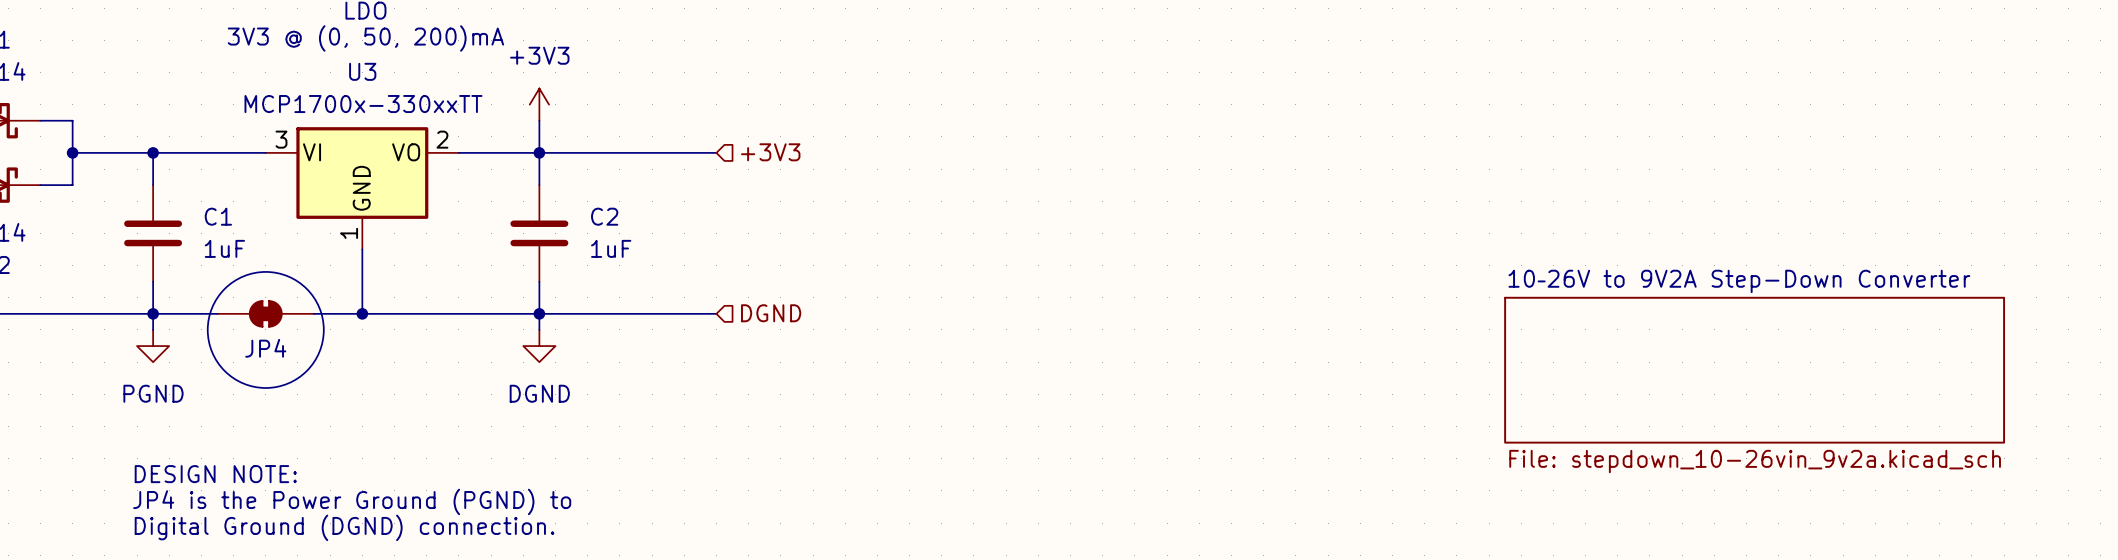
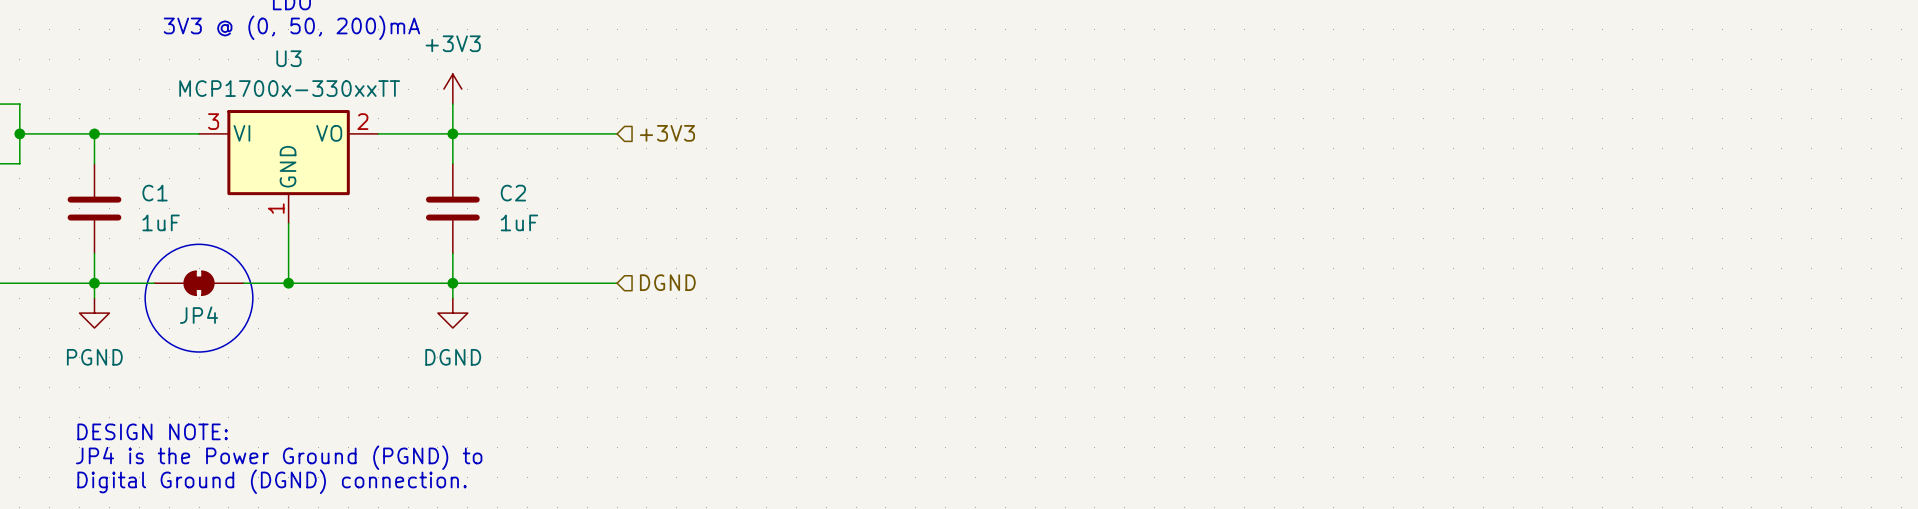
sheet 10–26V to 9V2A Step-Down Converter: File: stepdown_10-26vin_9v2a.kicad_sch (1754, 370) -> none

